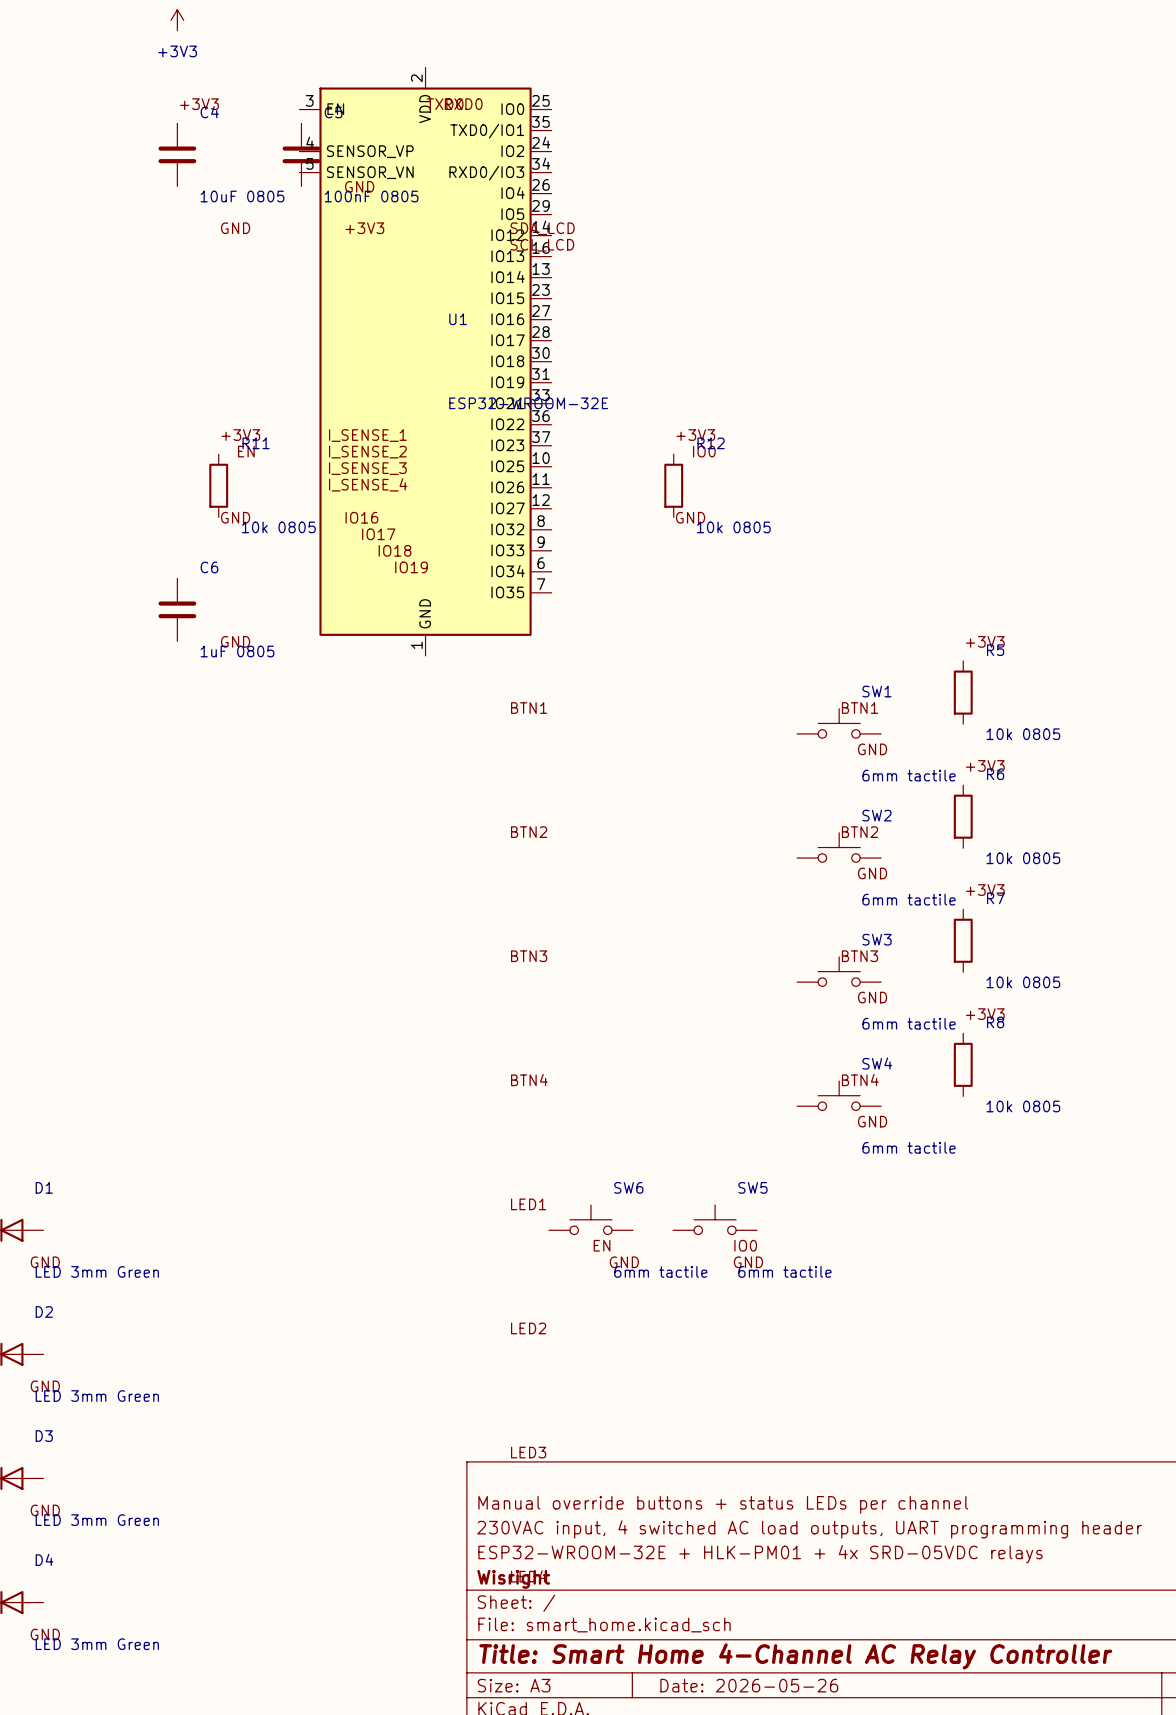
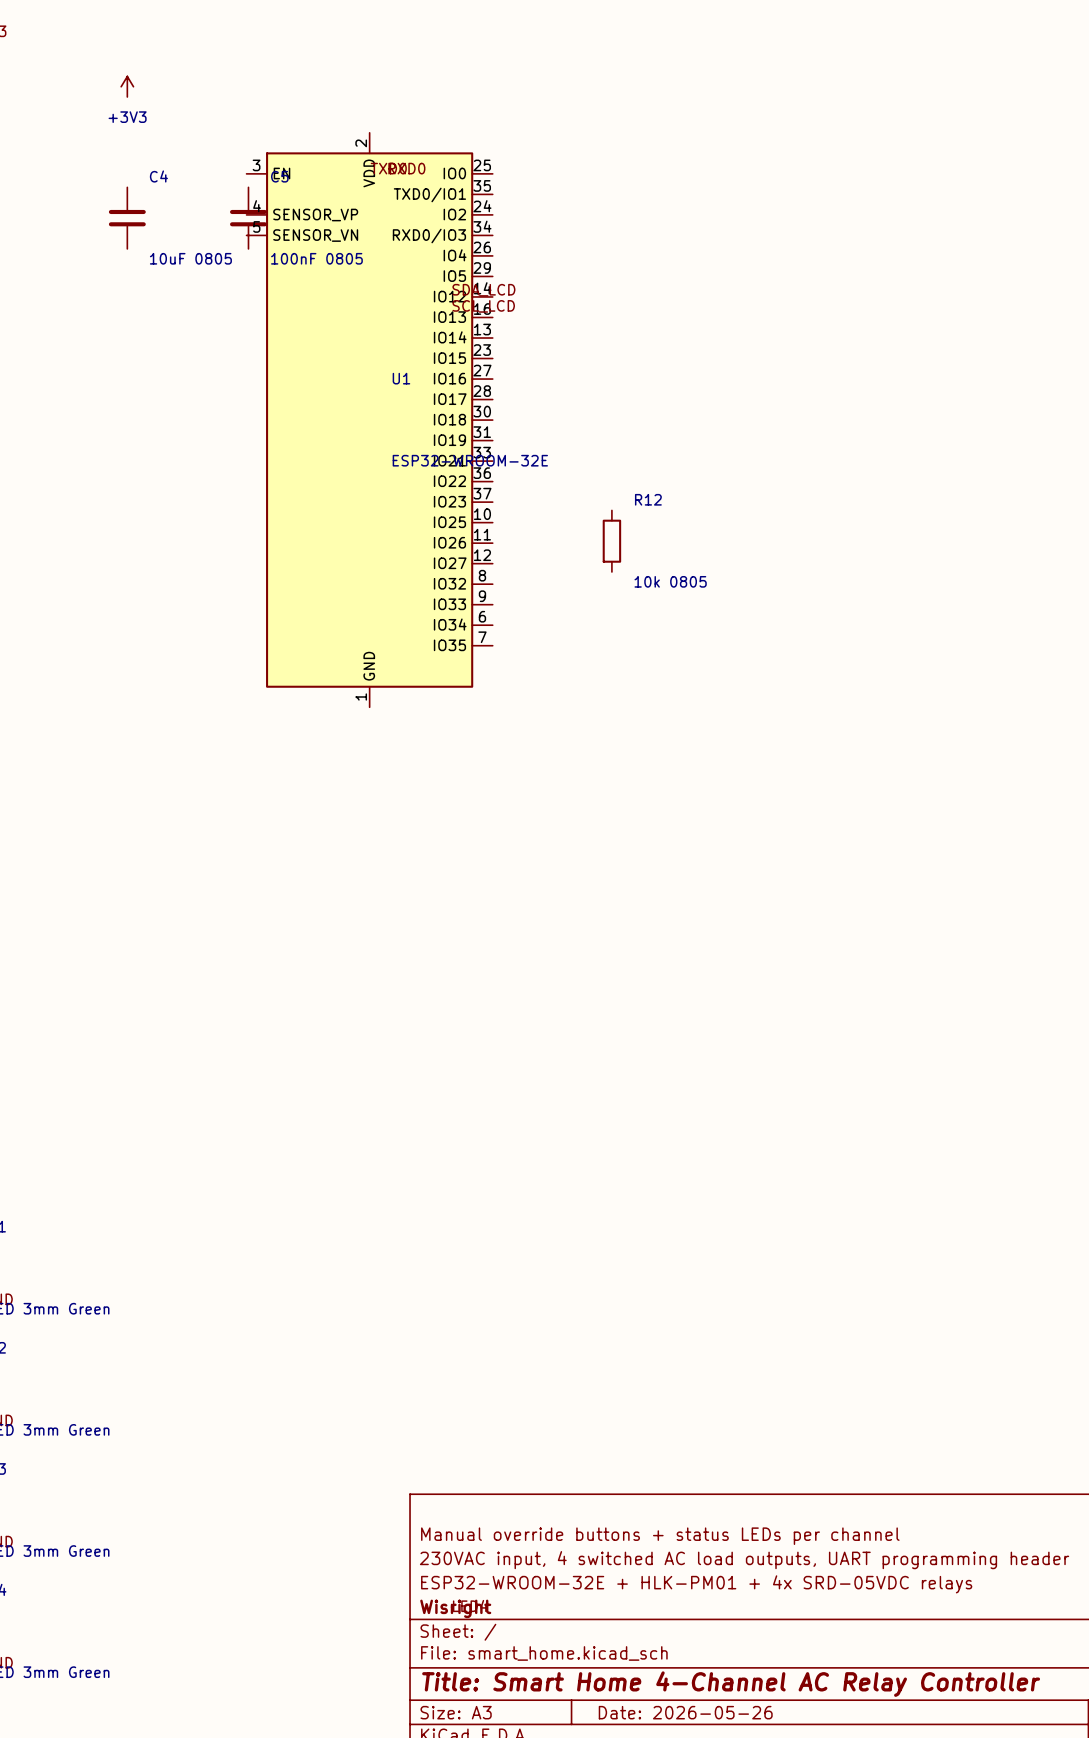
label: +3V3 (199, 104) -> none
label: GND (359, 186) -> none
label: GND (235, 228) -> none
label: +3V3 (364, 228) -> none
label: +3V3 (240, 435) -> none
label: I_SENSE_1 (367, 435) -> none
label: +3V3 (695, 435) -> none
label: EN (246, 451) -> none
label: IO0 (704, 451) -> none
label: I_SENSE_2 (367, 452) -> none
label: I_SENSE_3 (367, 468) -> none
label: I_SENSE_4 (368, 484) -> none
R11: 10k 0805 (218, 485) -> none
label: GND (235, 517) -> none
label: IO16 (361, 517) -> none
label: GND (690, 517) -> none
label: IO17 (378, 534) -> none
label: IO18 (394, 550) -> none
label: IO19 (411, 567) -> none
C6: 1uF 0805 (177, 609) -> none
label: GND (235, 641) -> none
label: +3V3 (985, 641) -> none
R5: 10k 0805 (963, 692) -> none
label: BTN1 (529, 708) -> none
label: BTN1 (860, 708) -> none
SW1: 6mm tactile (839, 723) -> none
label: GND (872, 749) -> none
label: +3V3 (985, 765) -> none
R6: 10k 0805 (963, 816) -> none
label: BTN2 (529, 832) -> none
label: BTN2 (860, 832) -> none
SW2: 6mm tactile (839, 847) -> none
label: GND (872, 873) -> none
label: +3V3 (985, 890) -> none
R7: 10k 0805 (963, 940) -> none
label: BTN3 (529, 956) -> none
label: BTN3 (860, 956) -> none
SW3: 6mm tactile (839, 971) -> none
label: GND (872, 997) -> none
label: +3V3 (985, 1014) -> none
R8: 10k 0805 (963, 1064) -> none
label: BTN4 (529, 1080) -> none
label: BTN4 (860, 1080) -> none
SW4: 6mm tactile (839, 1095) -> none
label: GND (872, 1121) -> none
label: LED1 (528, 1204) -> none
SW6: 6mm tactile (590, 1219) -> none
SW5: 6mm tactile (715, 1219) -> none
label: EN (602, 1245) -> none
label: IO0 (745, 1245) -> none
label: GND (624, 1262) -> none
label: GND (748, 1262) -> none
label: LED2 (528, 1328) -> none
label: LED3 (528, 1452) -> none

